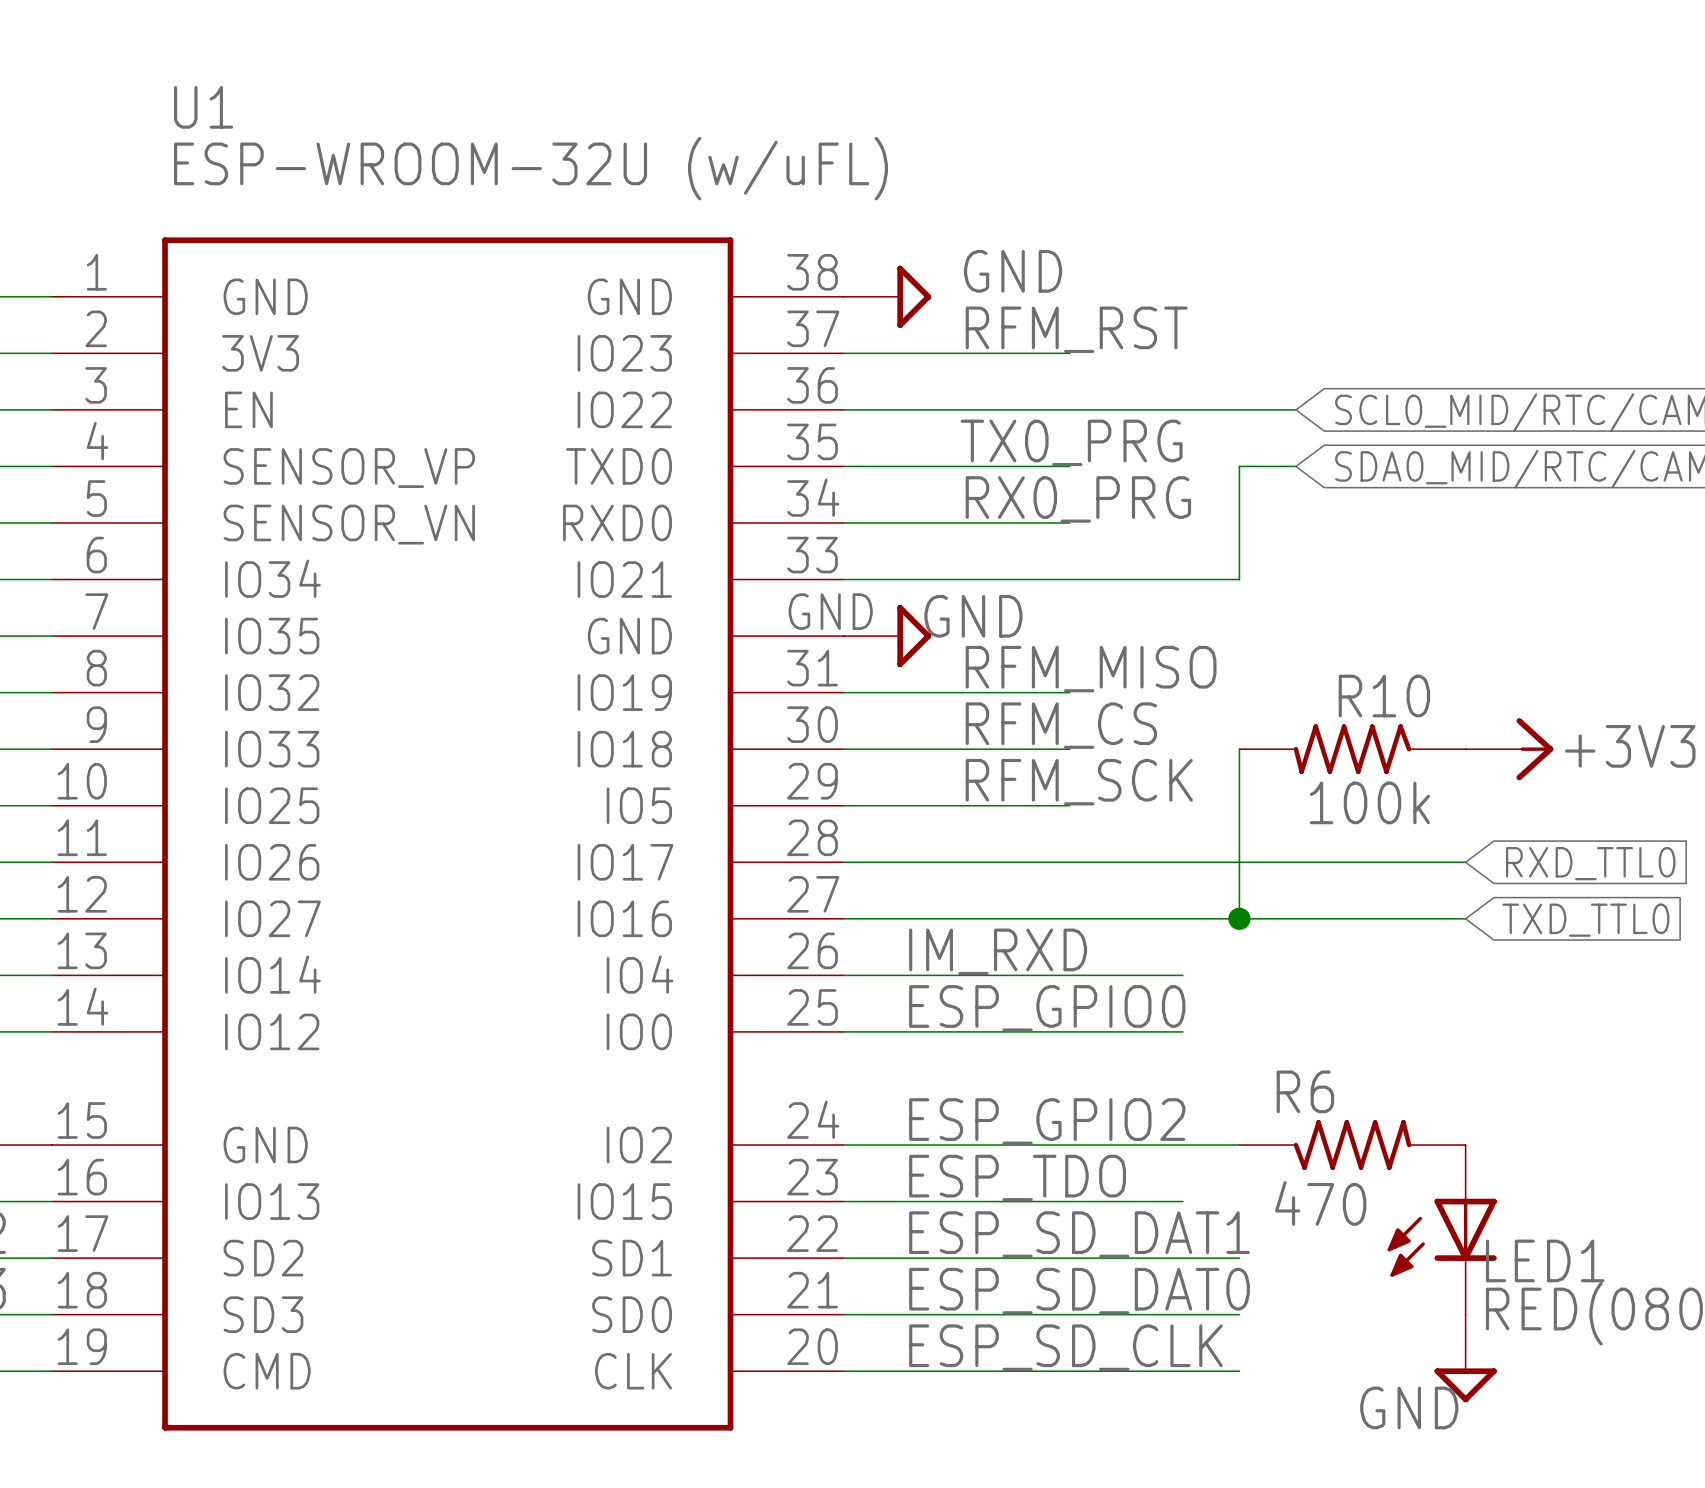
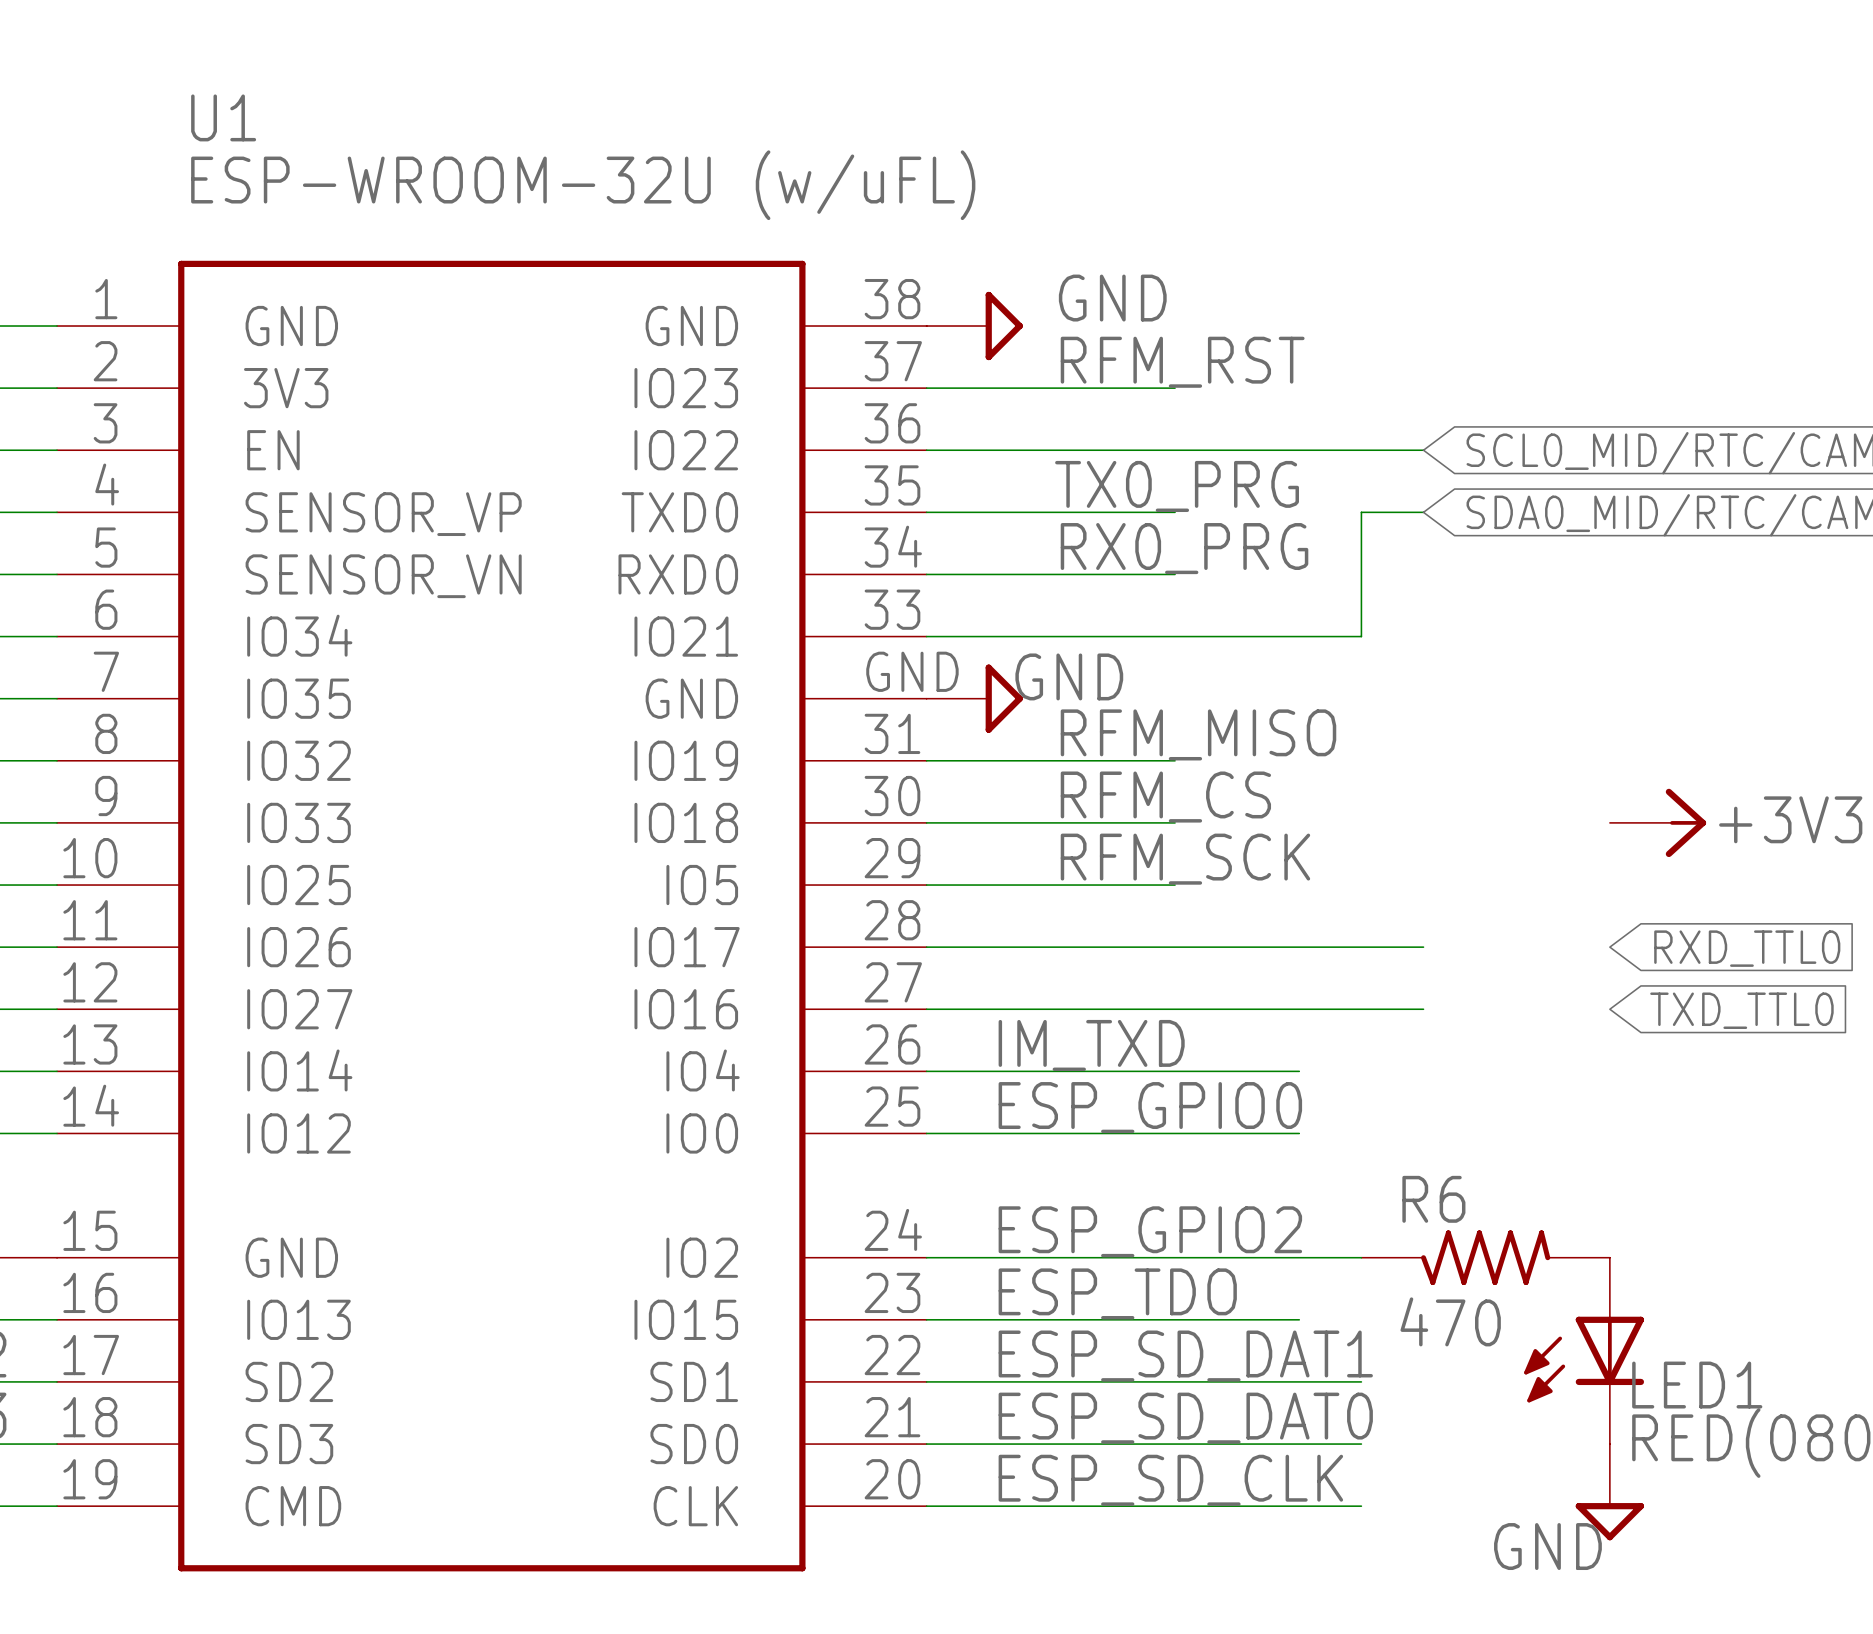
wire: (1239, 749) (1239, 918) -> none
R10: 100k (1352, 749) -> none
wire: (1295, 862) (1465, 862) -> none
junction: (1239, 918) -> none
wire: (1295, 918) (1465, 918) -> none
label: IM_RXD (998, 951) -> IM_TXD (1091, 1045)

